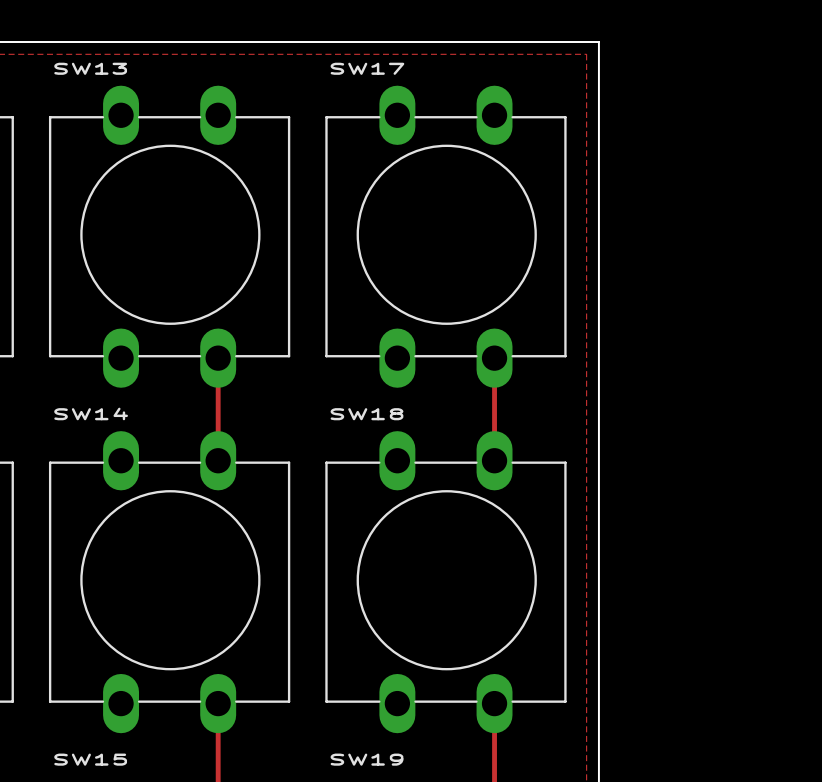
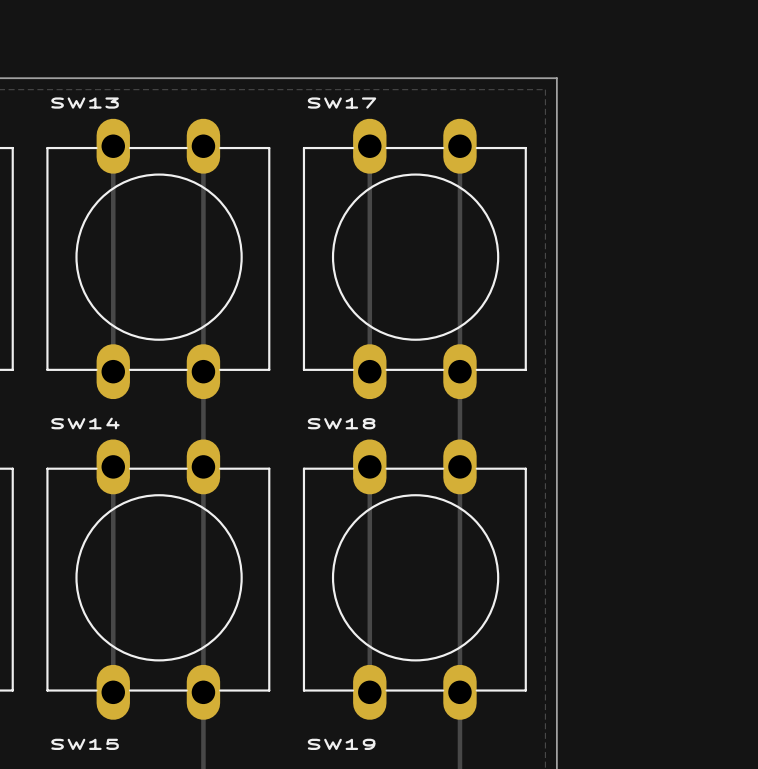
track: none -> (113, 146) (113, 371)
track: none -> (203, 146) (203, 371)
track: none -> (369, 146) (369, 371)
track: none -> (459, 146) (459, 371)
track: none -> (113, 466) (113, 692)
track: none -> (203, 466) (203, 692)
track: none -> (369, 466) (369, 692)
track: none -> (459, 466) (459, 692)

